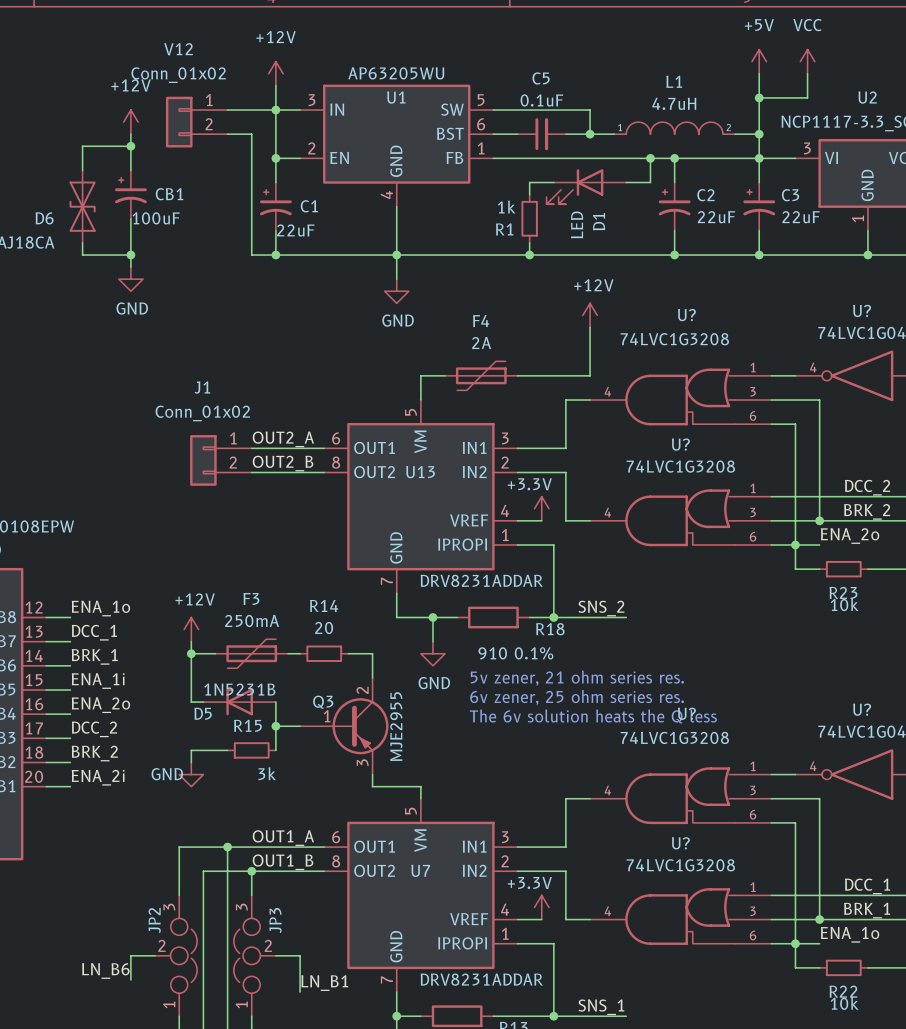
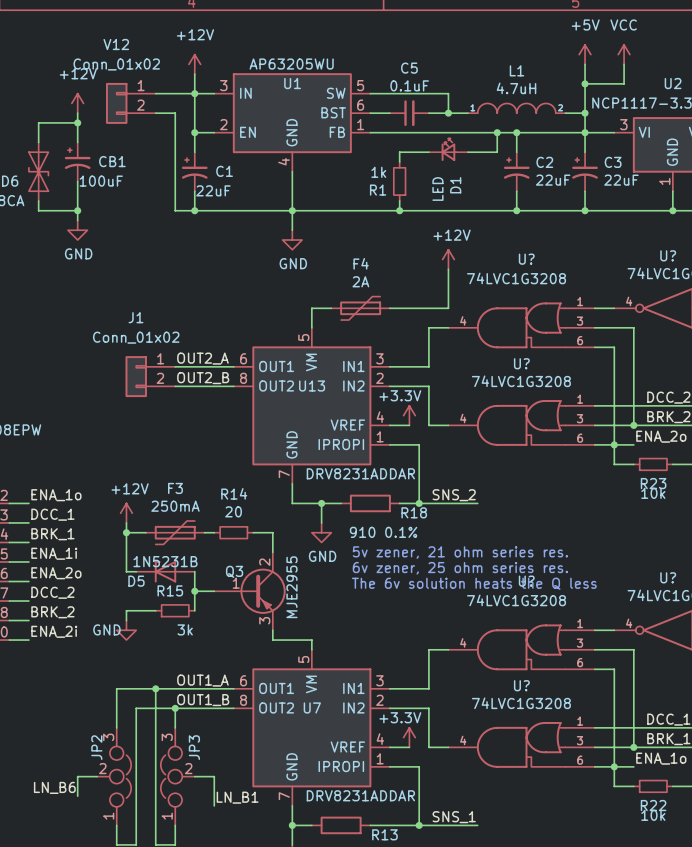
D1 symbol: [546, 169, 627, 205] -> [428, 138, 468, 161]

